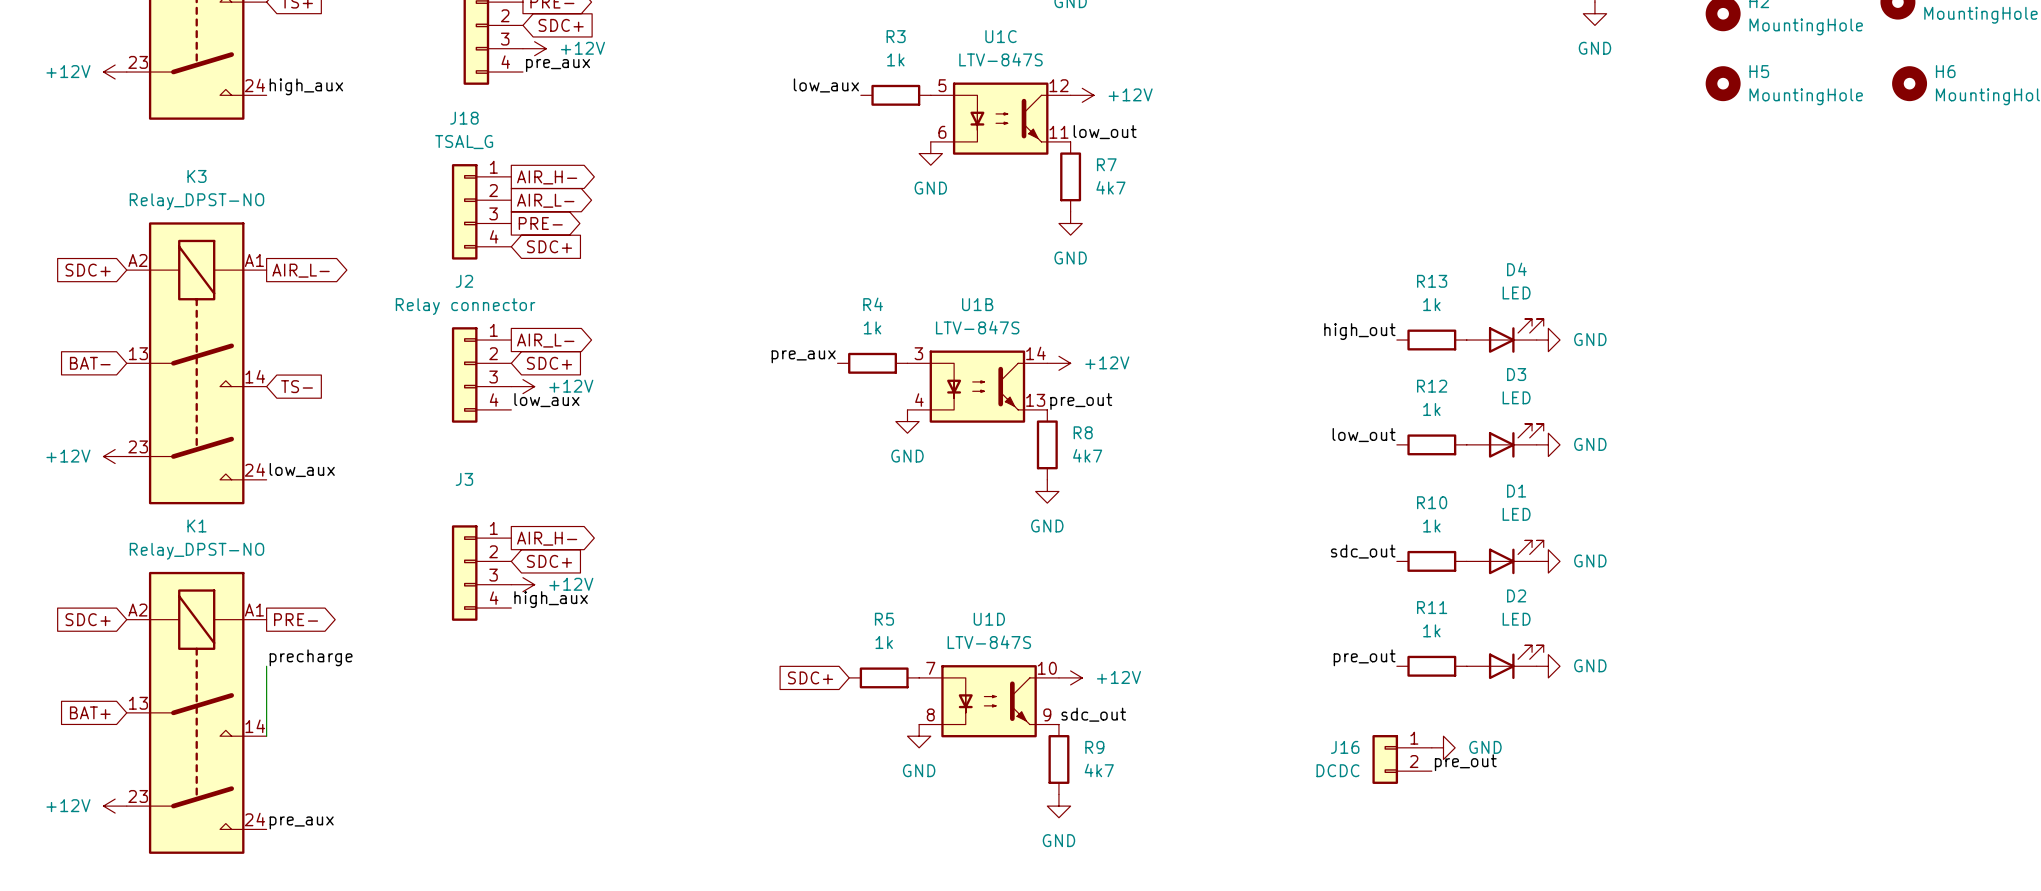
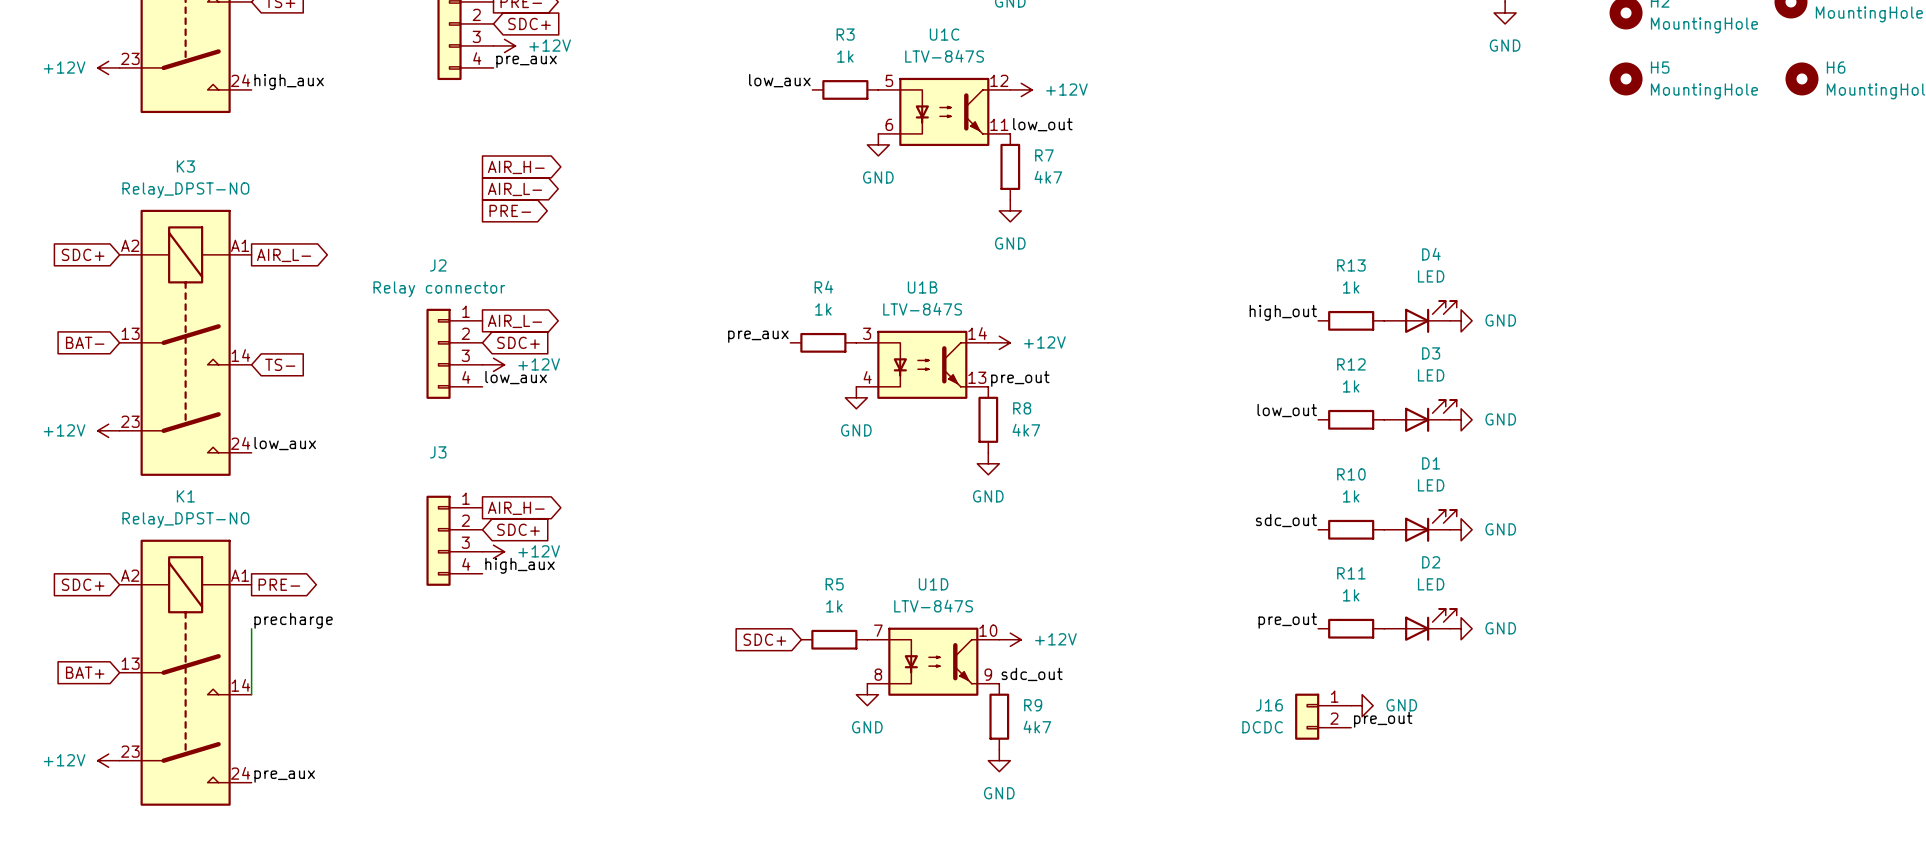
J18: TSAL_G (481, 211) -> none
global label: SDC+ (549, 246) -> none

